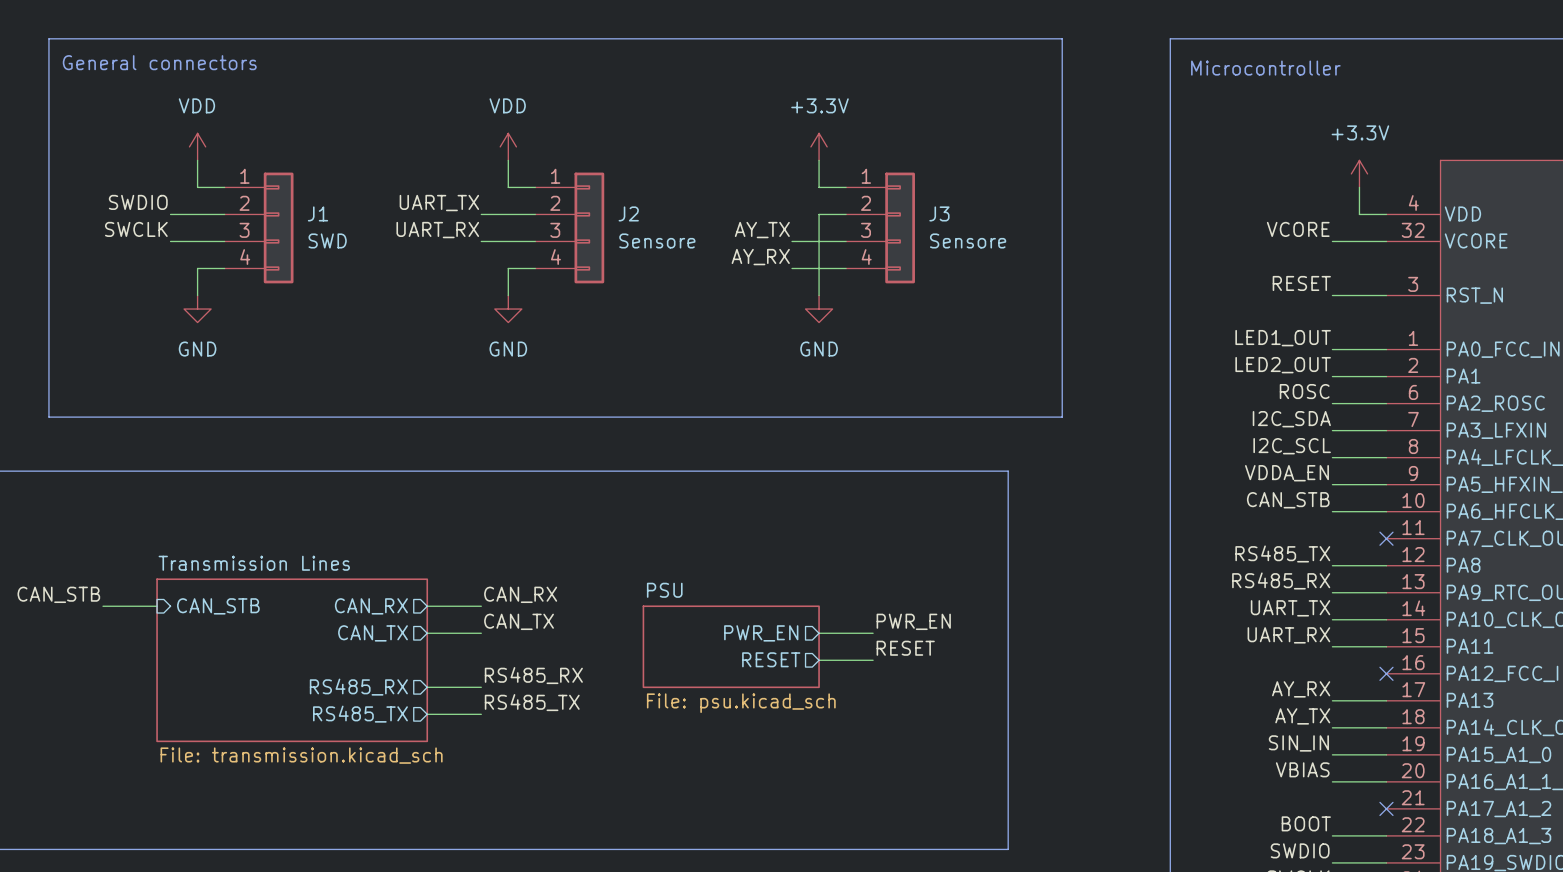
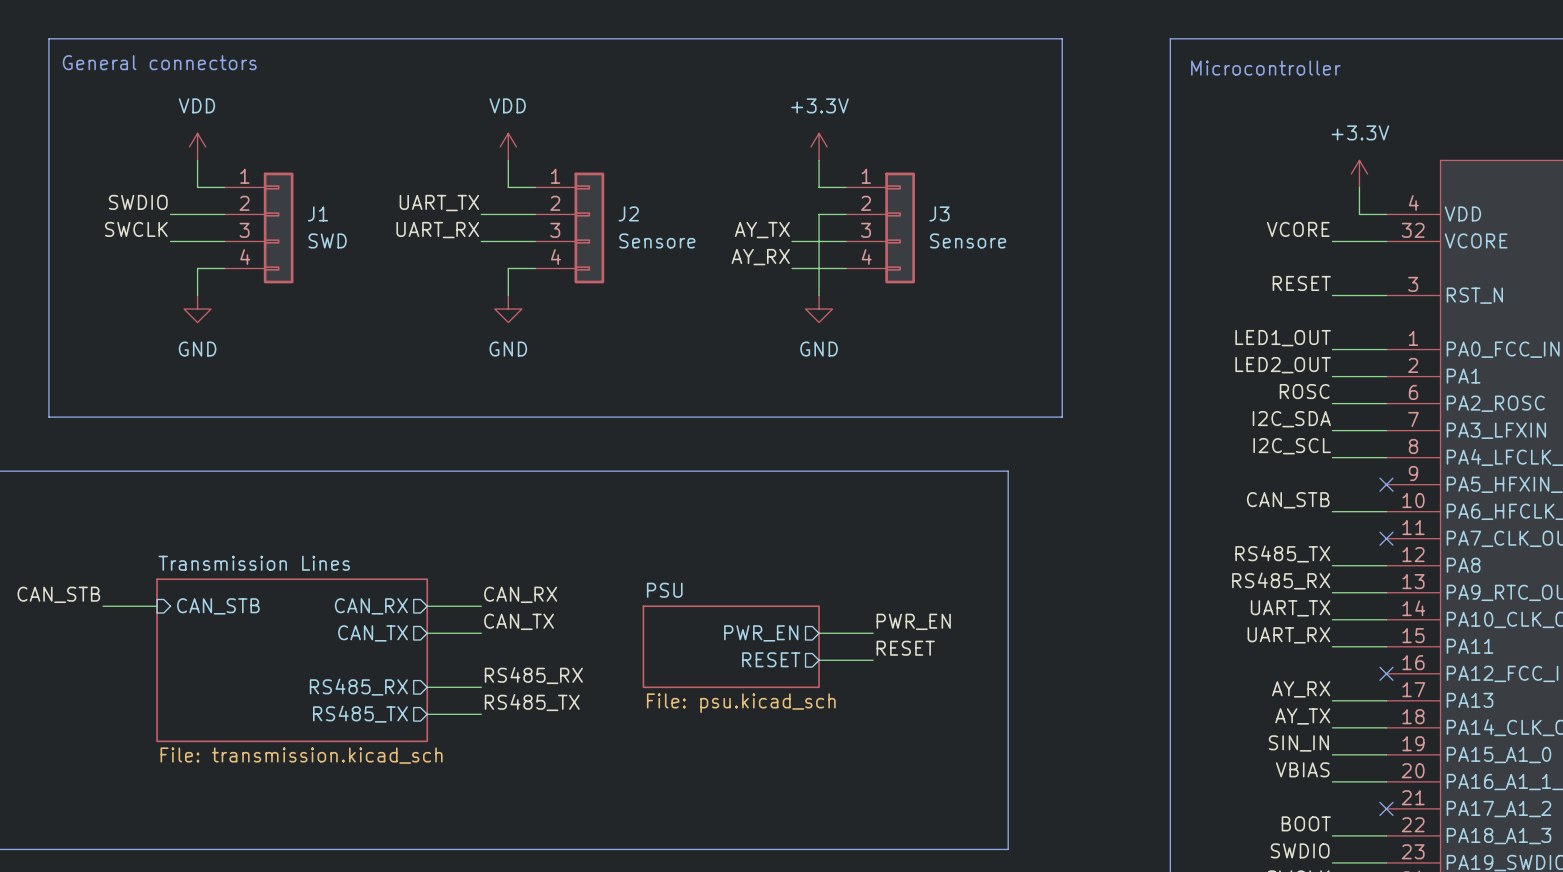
label: VDDA_EN (1286, 473) -> none
wire: (1332, 484) (1386, 484) -> none
no-connect mark: none -> (1386, 484)

